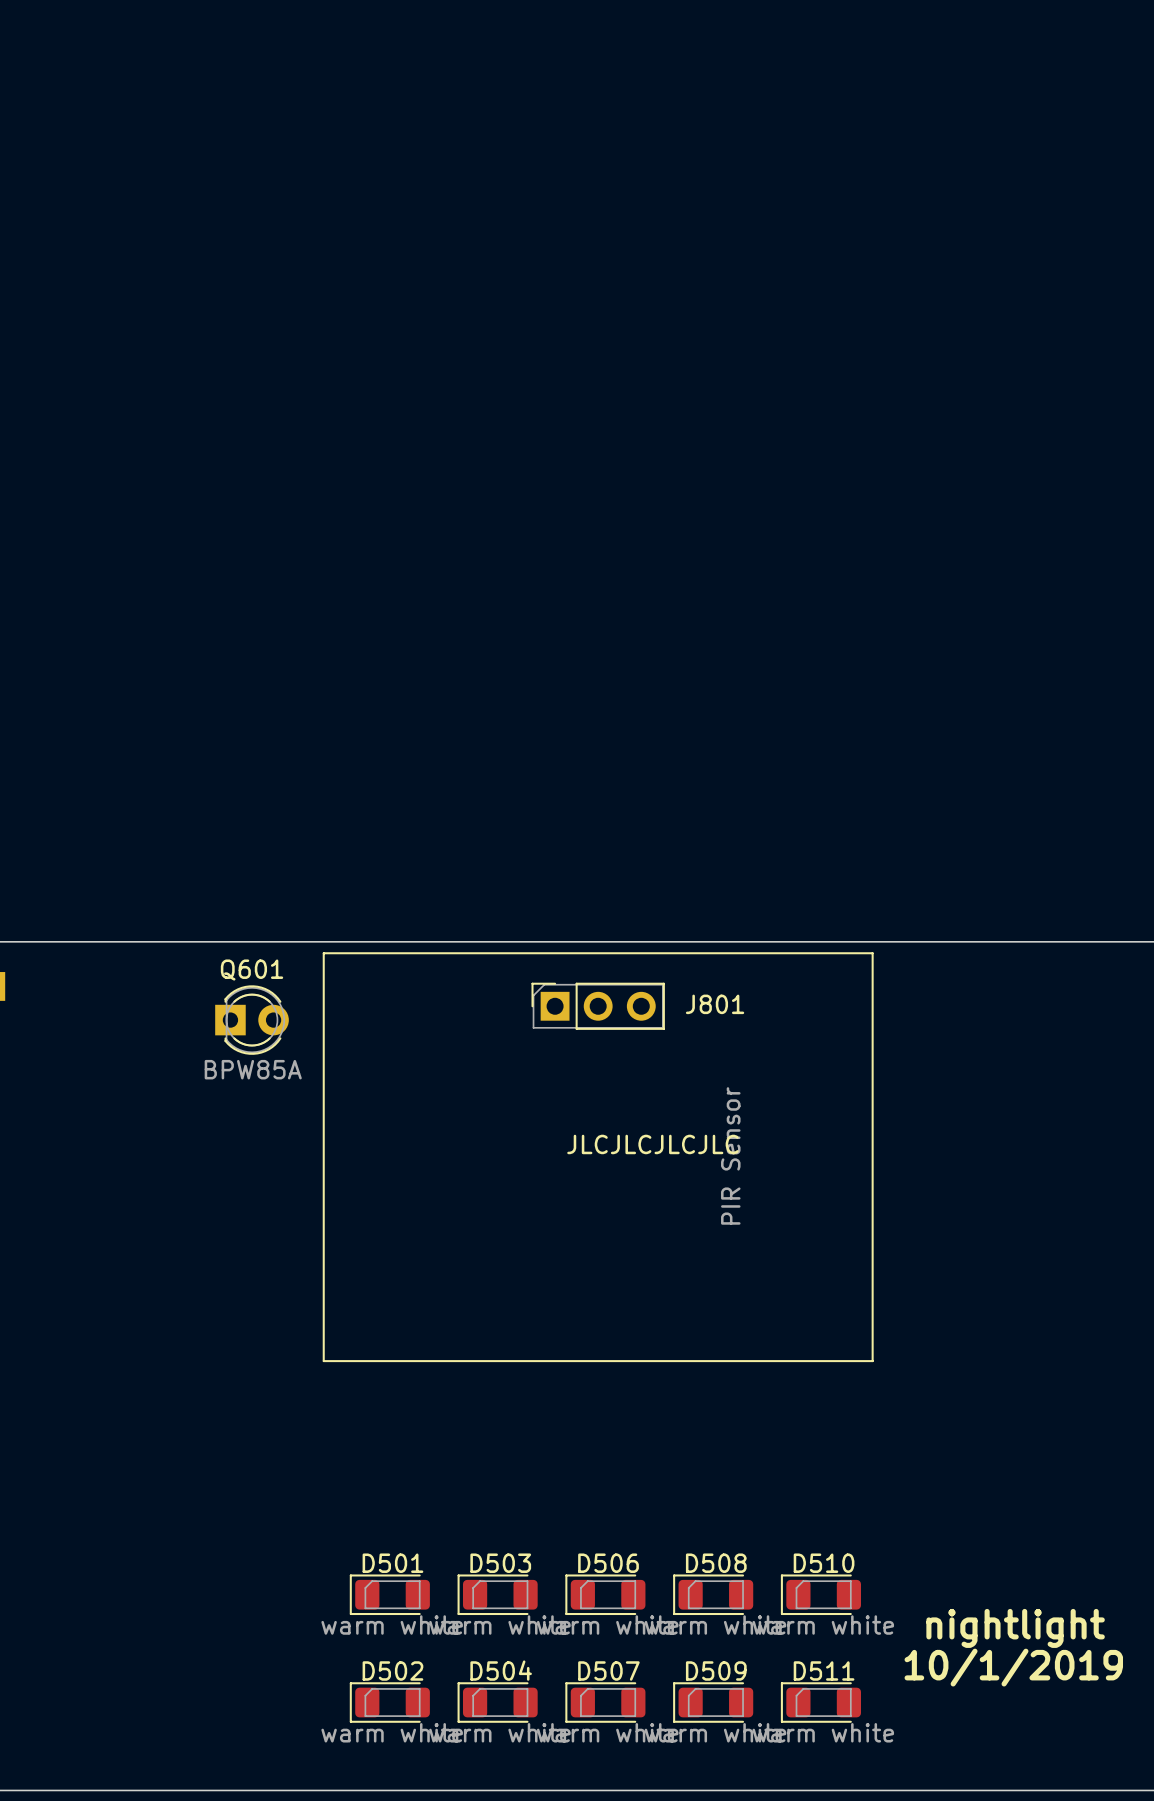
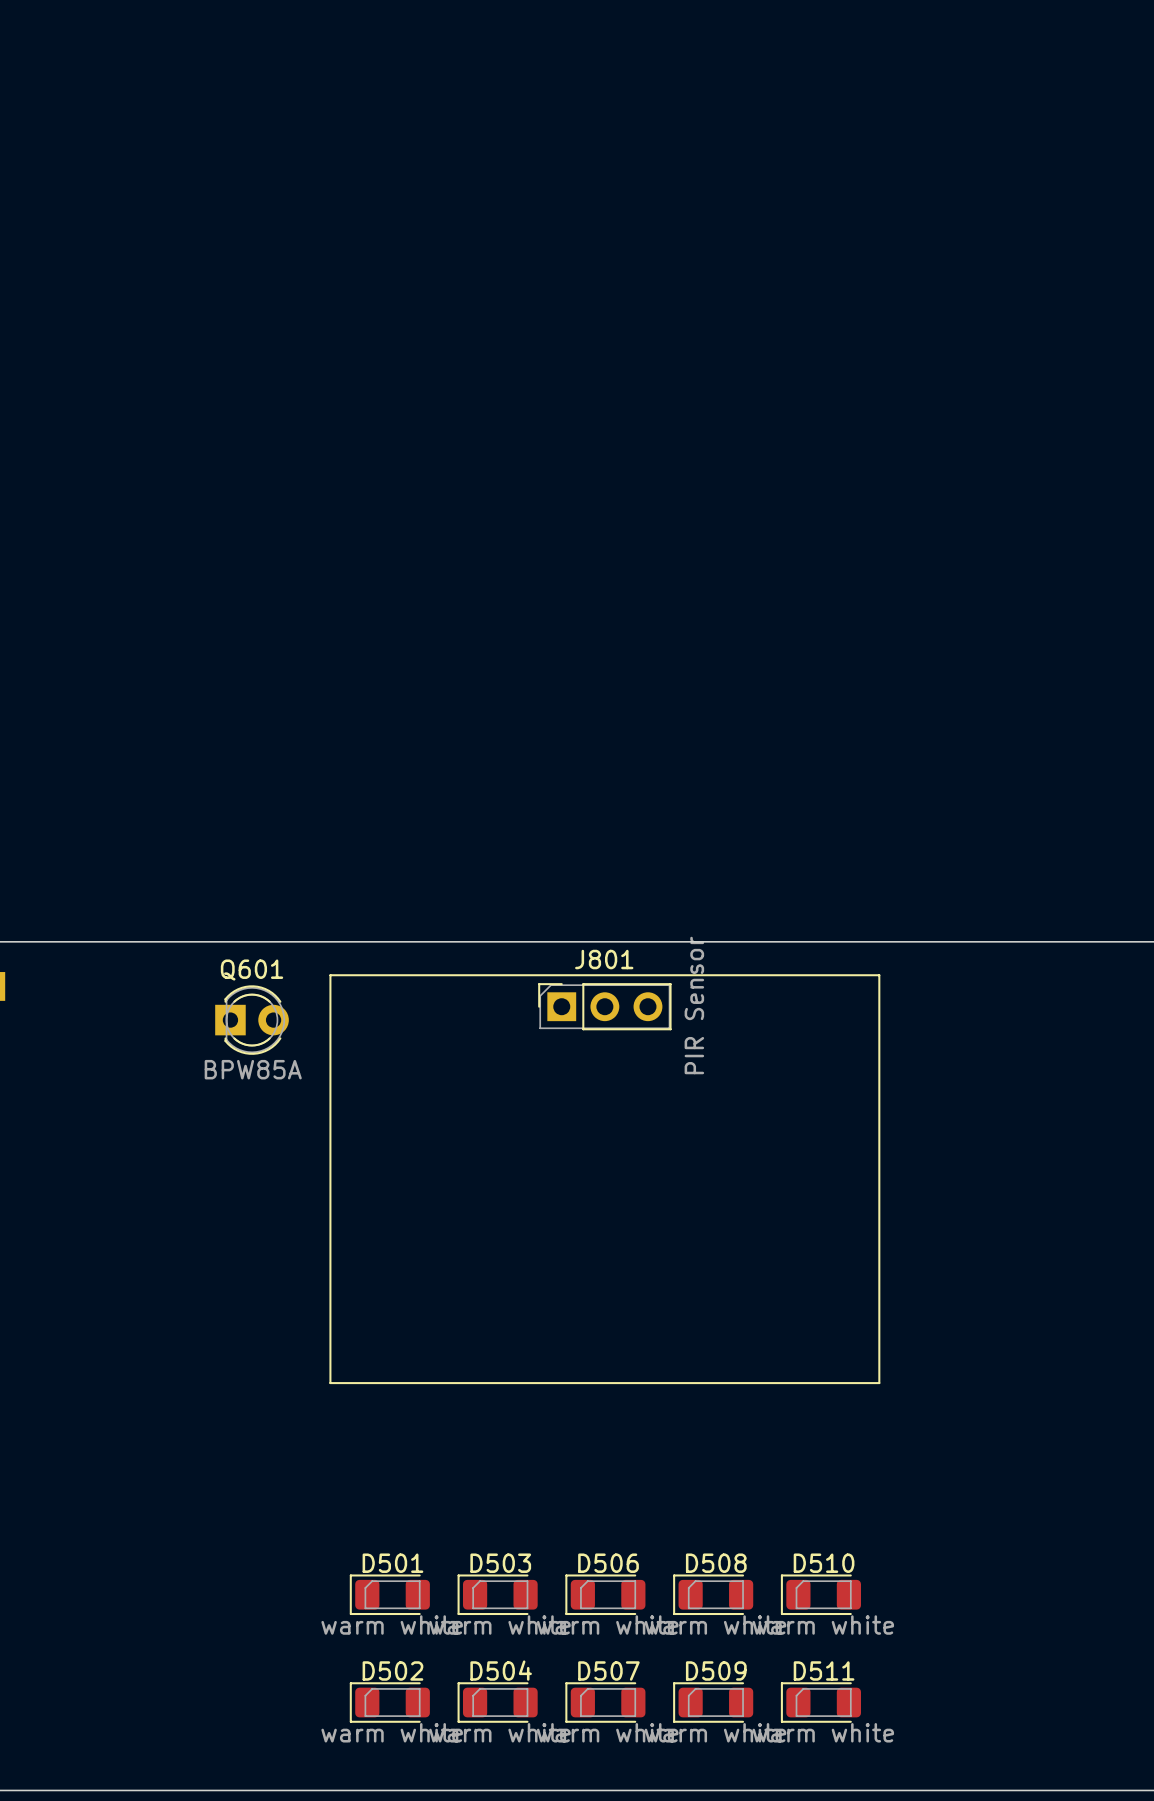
J801 footprint: [322, 952, 874, 1363] -> [329, 974, 881, 1385]
J801 name position: J801 (715, 1004) -> J801 (604, 959)
text: JLCJLCJLCJLC (652, 1144) -> none
J801 value position: PIR Sensor (730, 1155) -> PIR Sensor (694, 1005)
text: nightlight (1015, 1628) -> none
text: 10/1/2019 (1013, 1667) -> none

